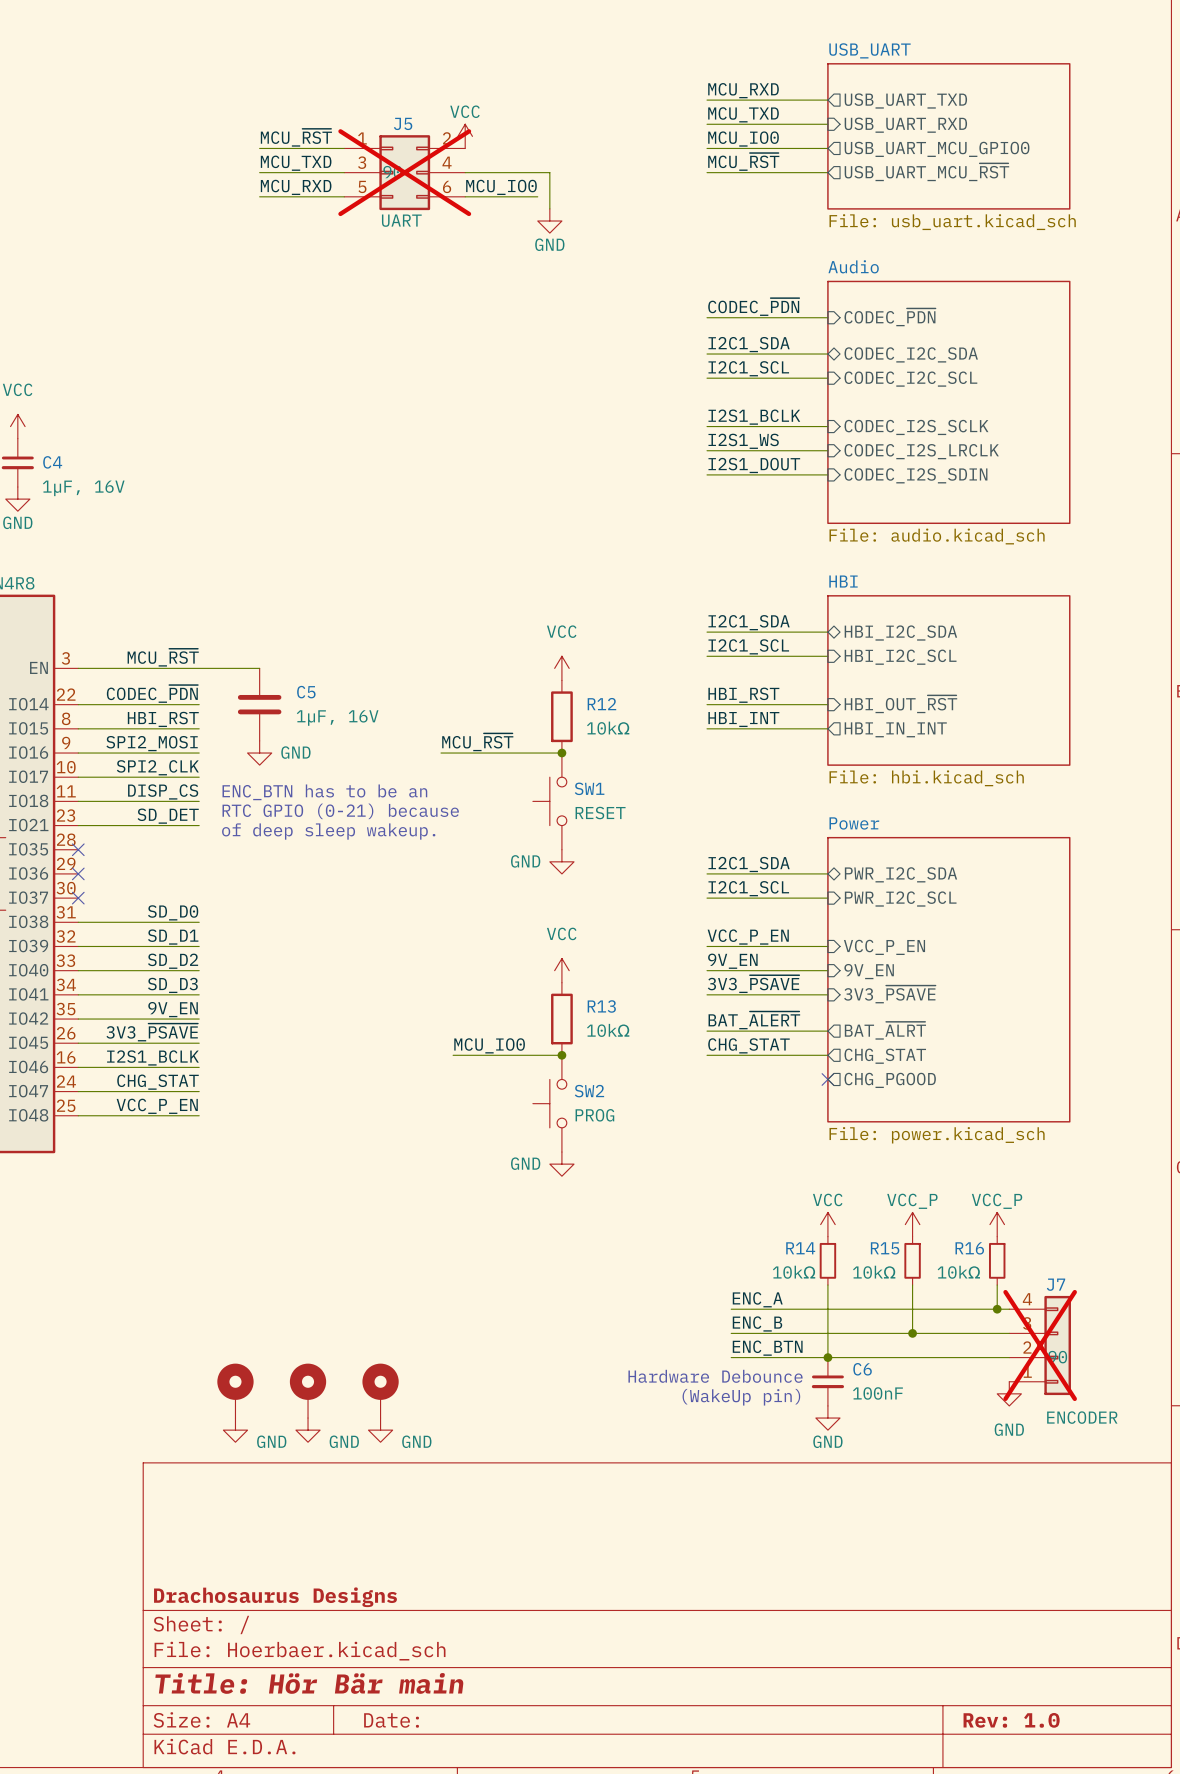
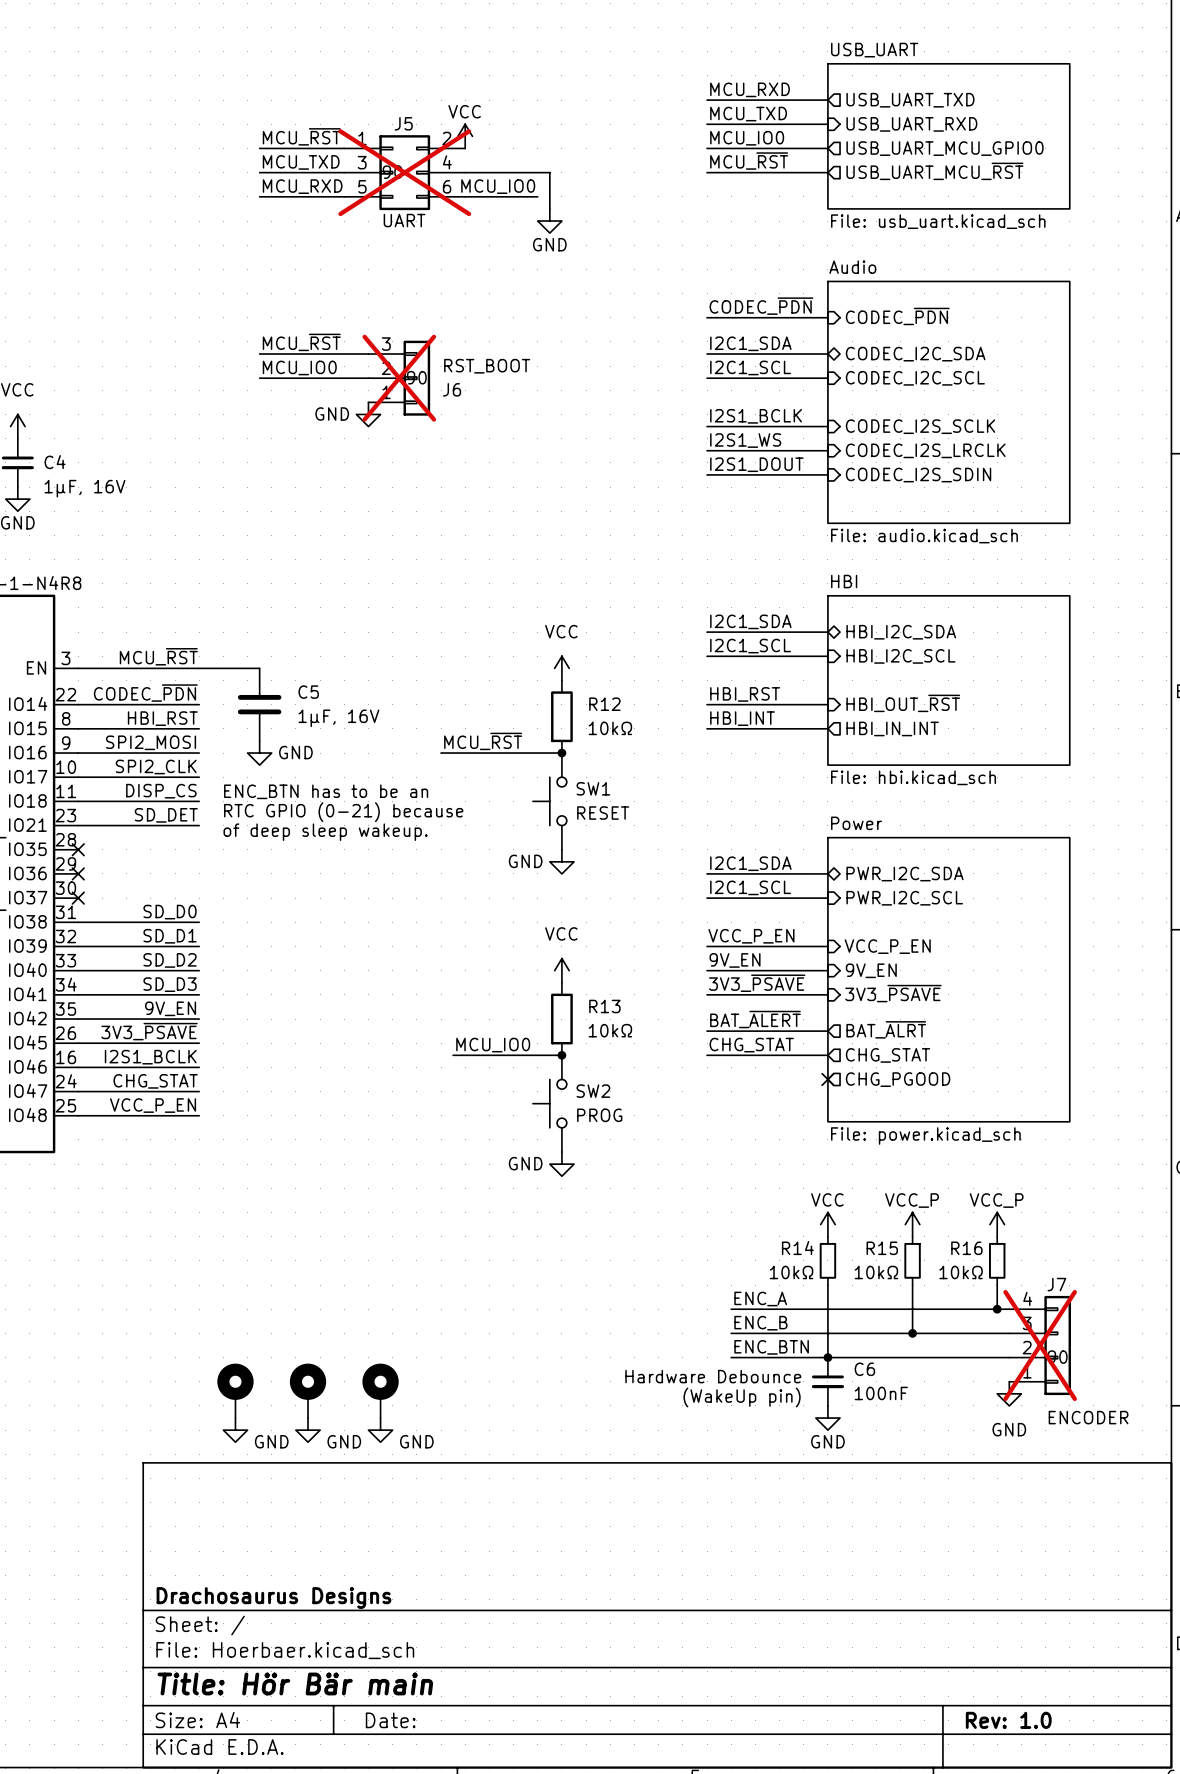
label: none -> MCU_~{RST} (301, 342)
wire: none -> (259, 354) (368, 354)
label: none -> MCU_IO0 (299, 367)
wire: none -> (259, 378) (368, 378)
J6: none -> RST_BOOT (399, 378)
power symbol: none -> GND (368, 414)

